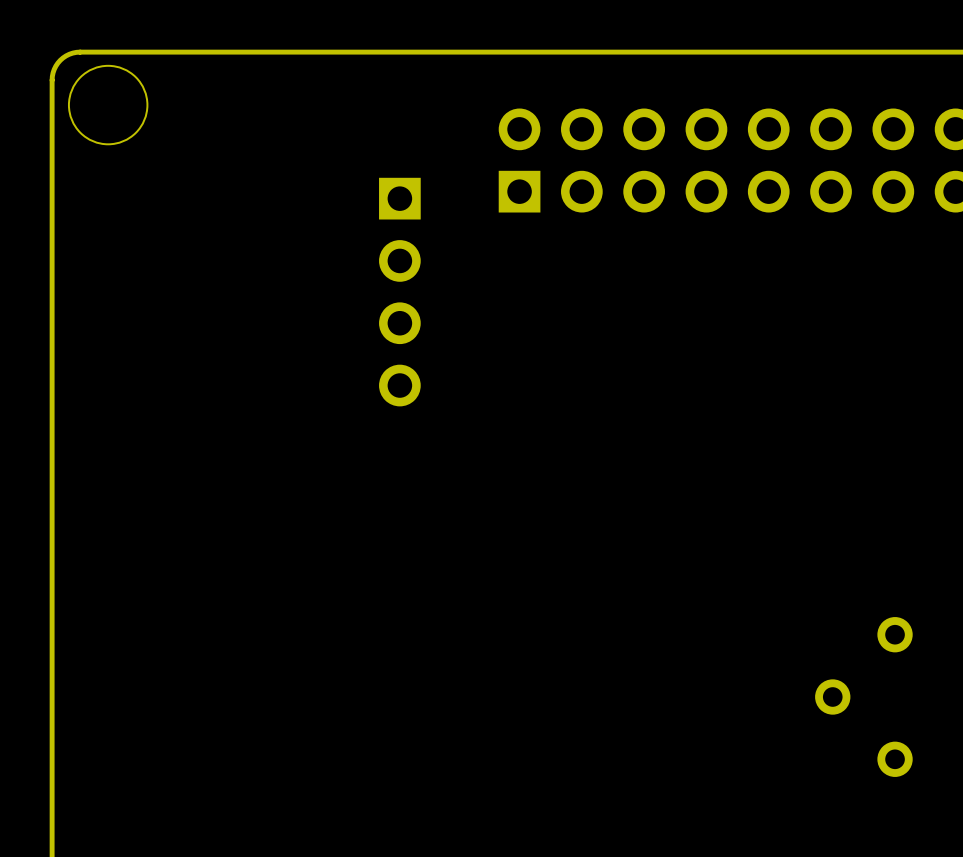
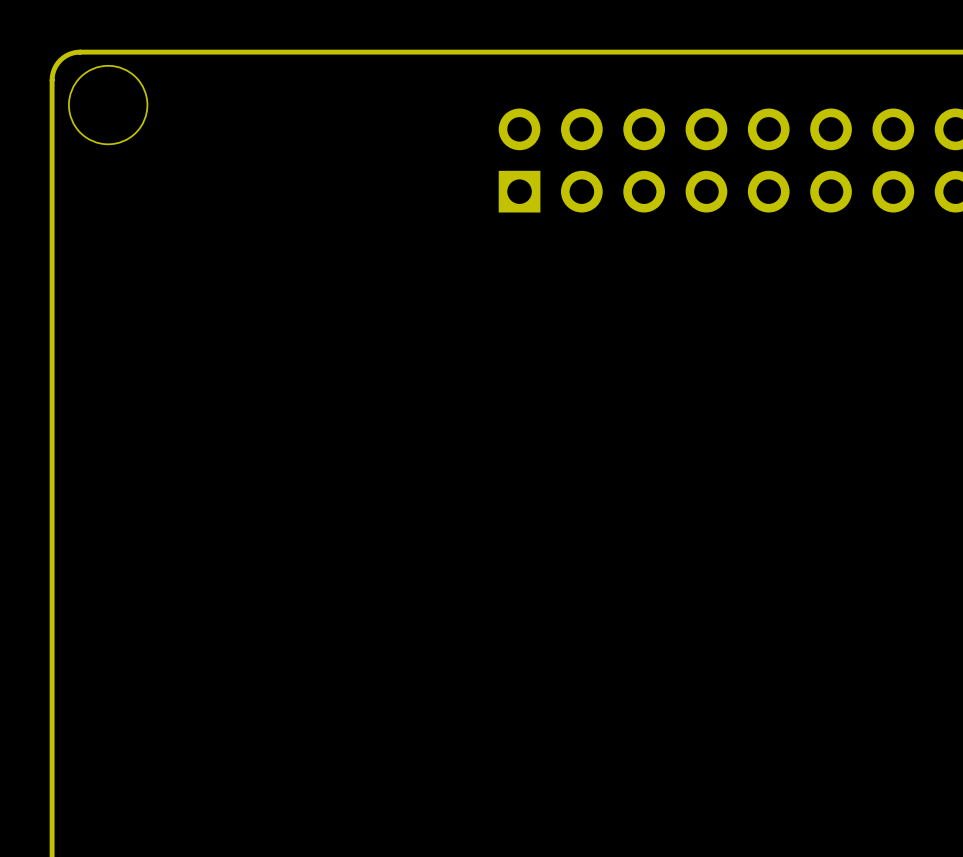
part: (399, 292) -> none
part: (863, 697) -> none

